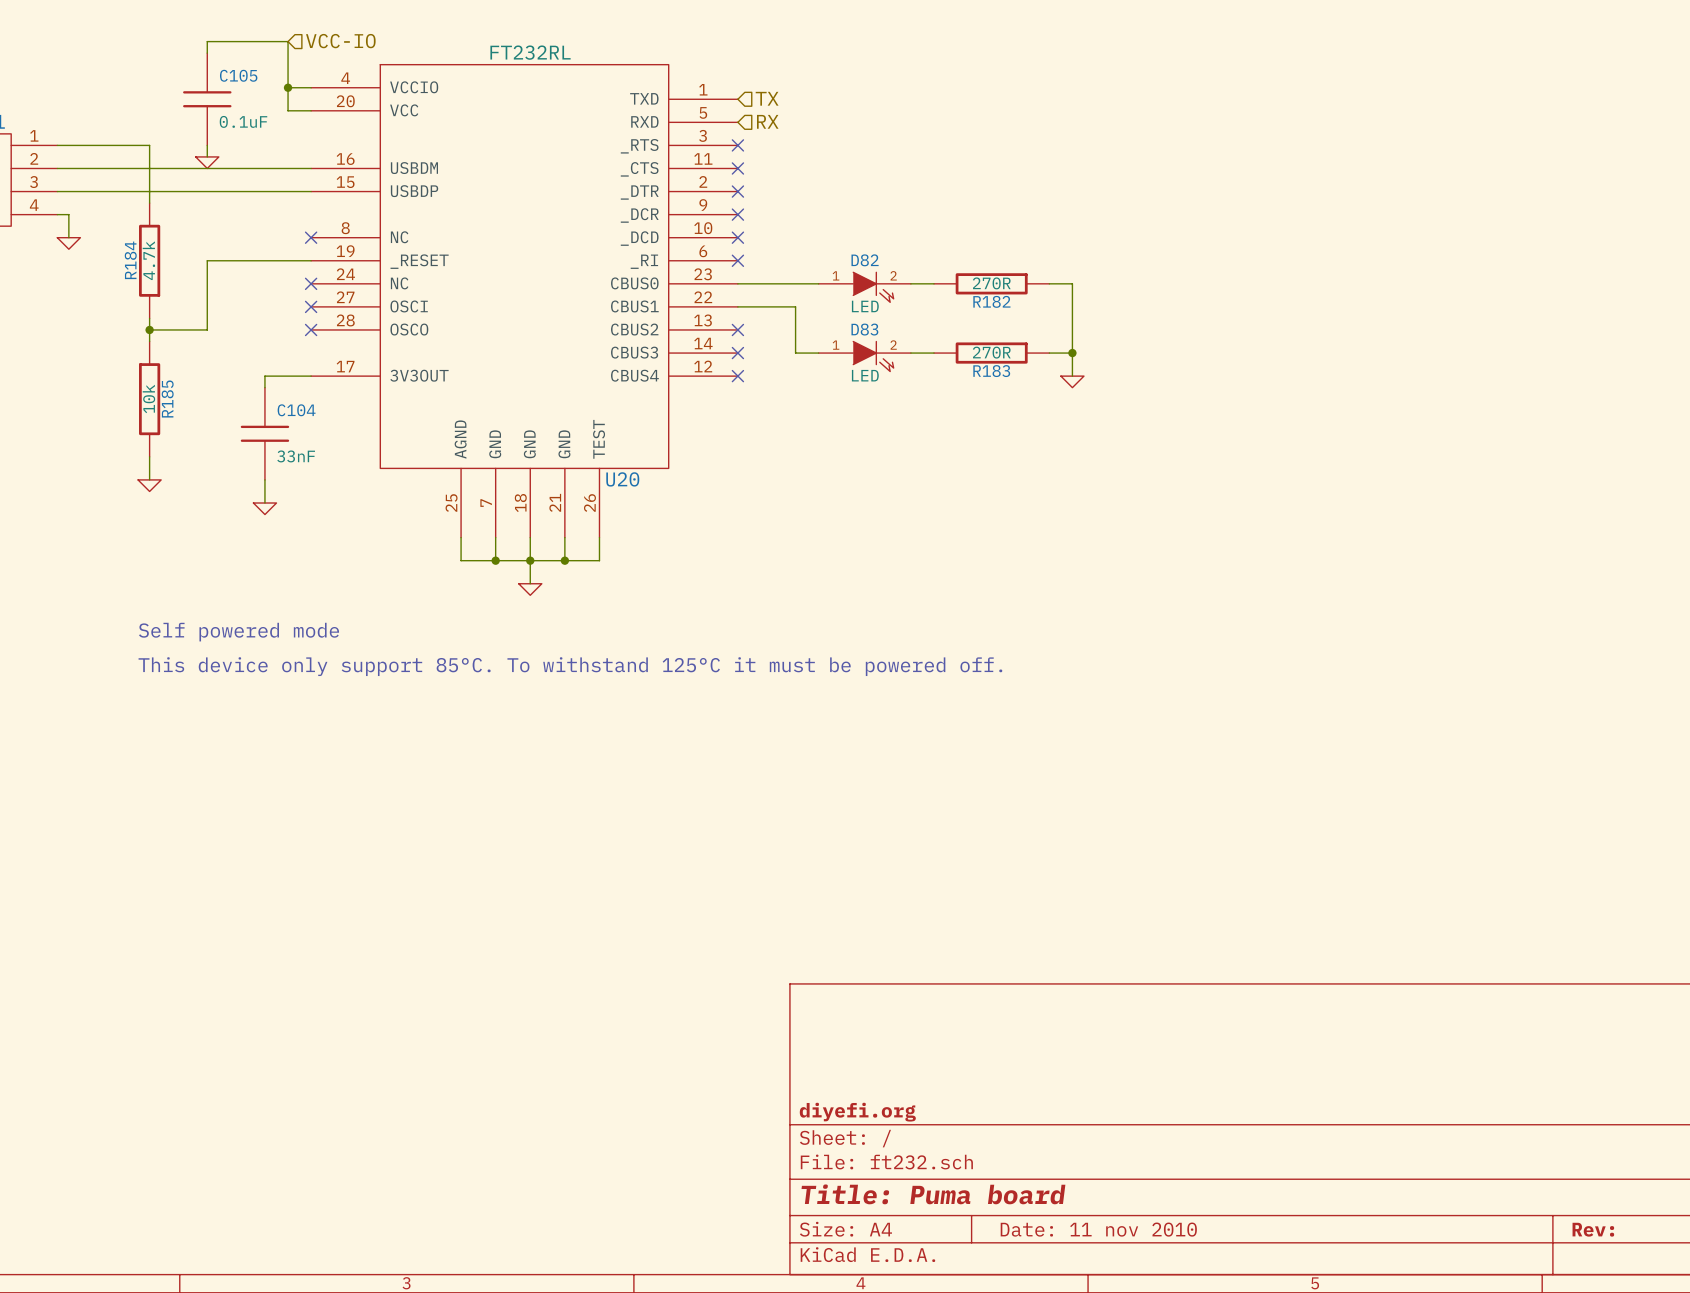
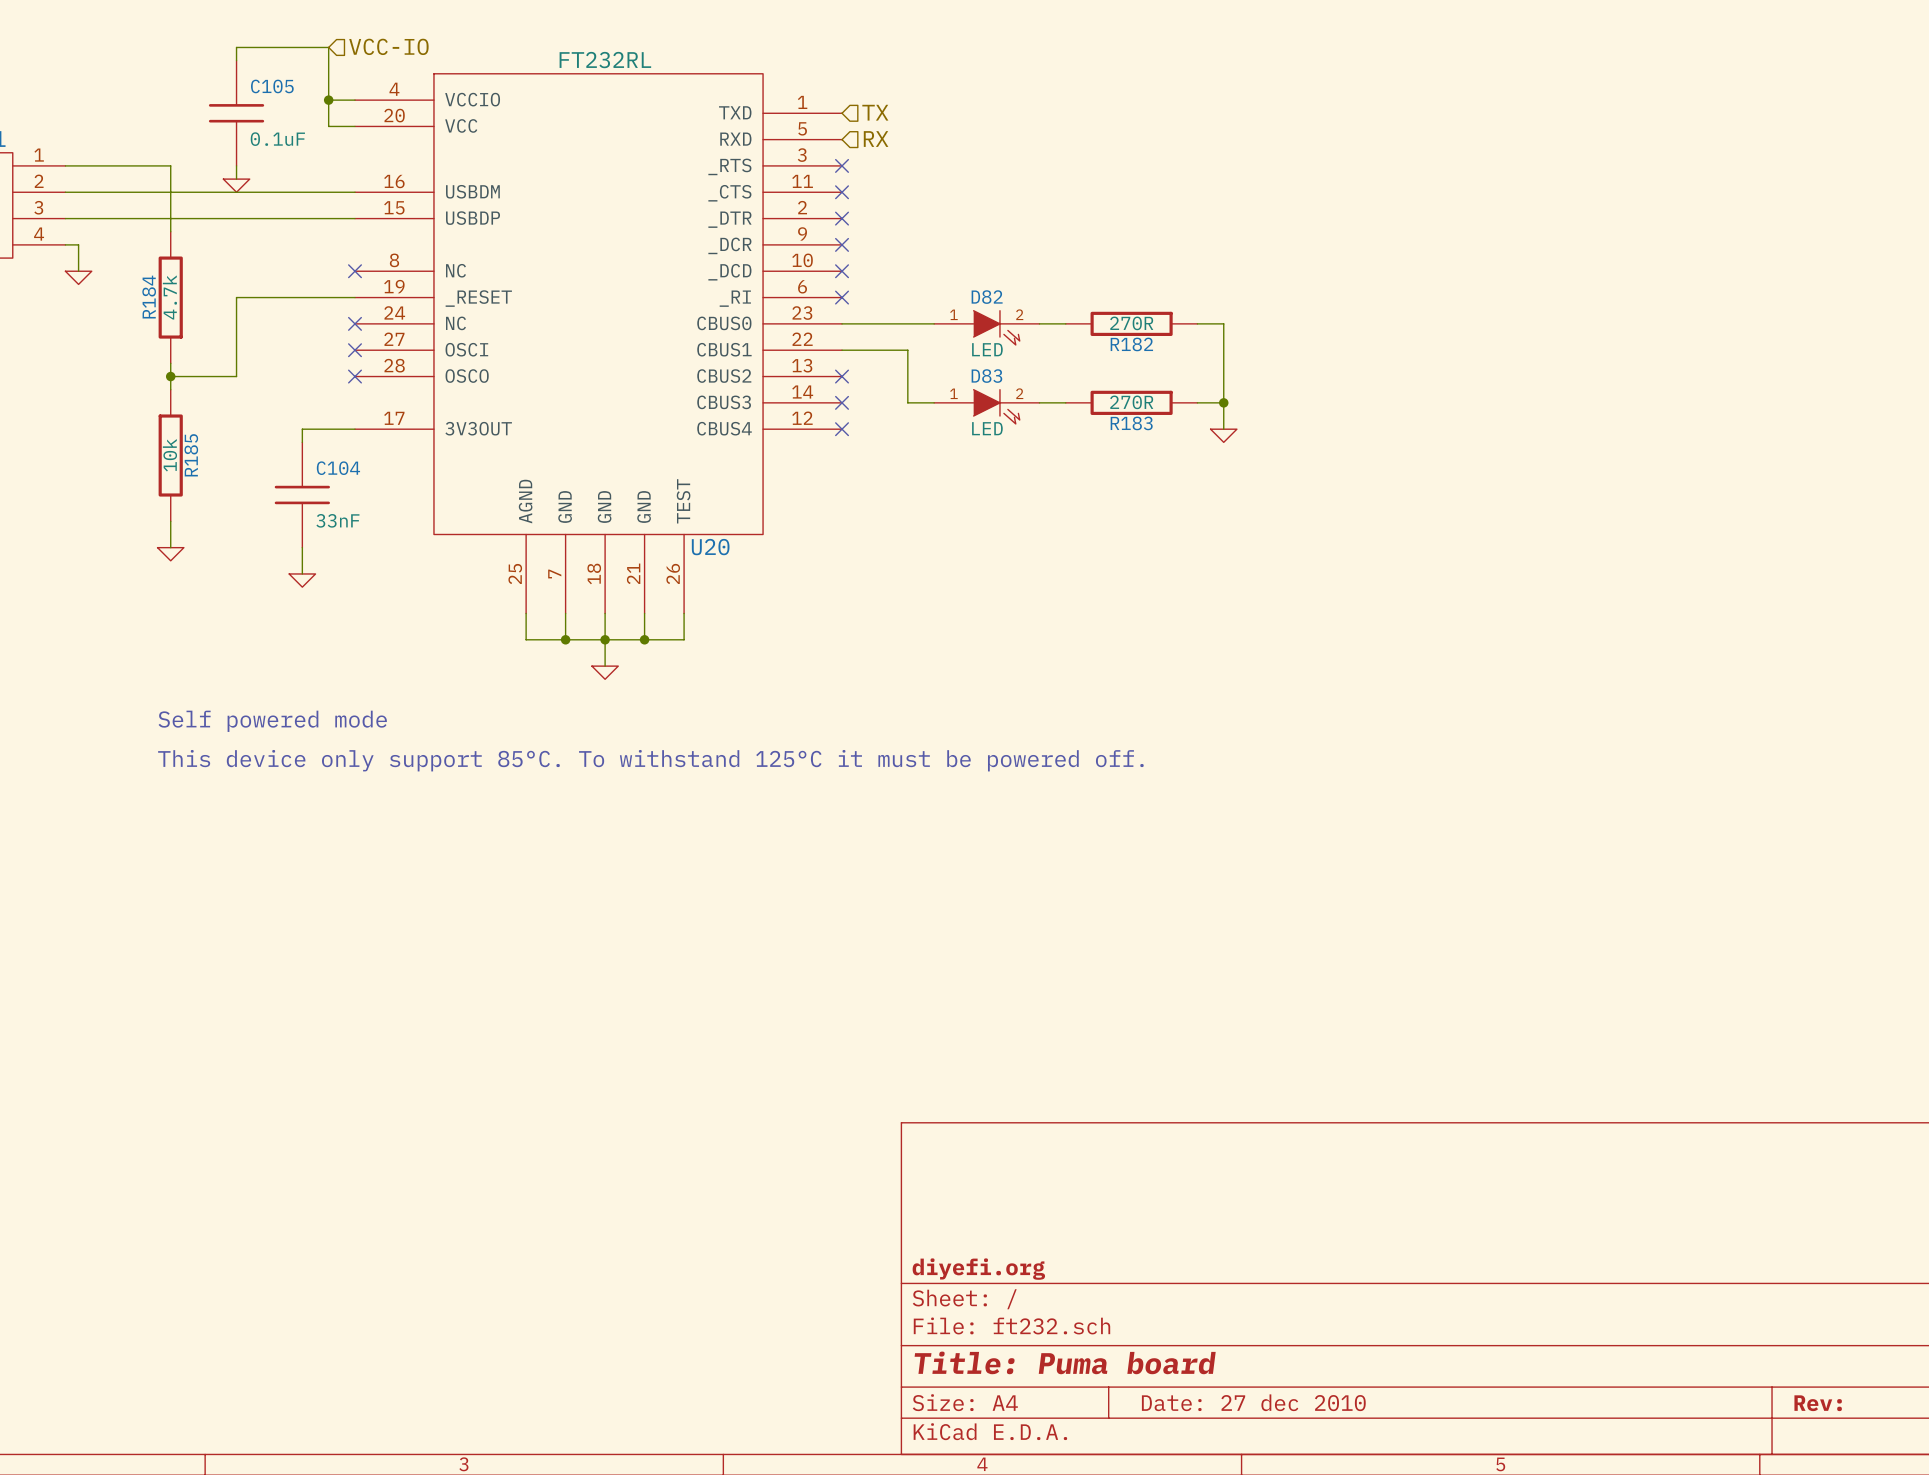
title block: Date: 11 nov 2010 (1098, 1229) -> Date: 27 dec 2010 (1253, 1402)

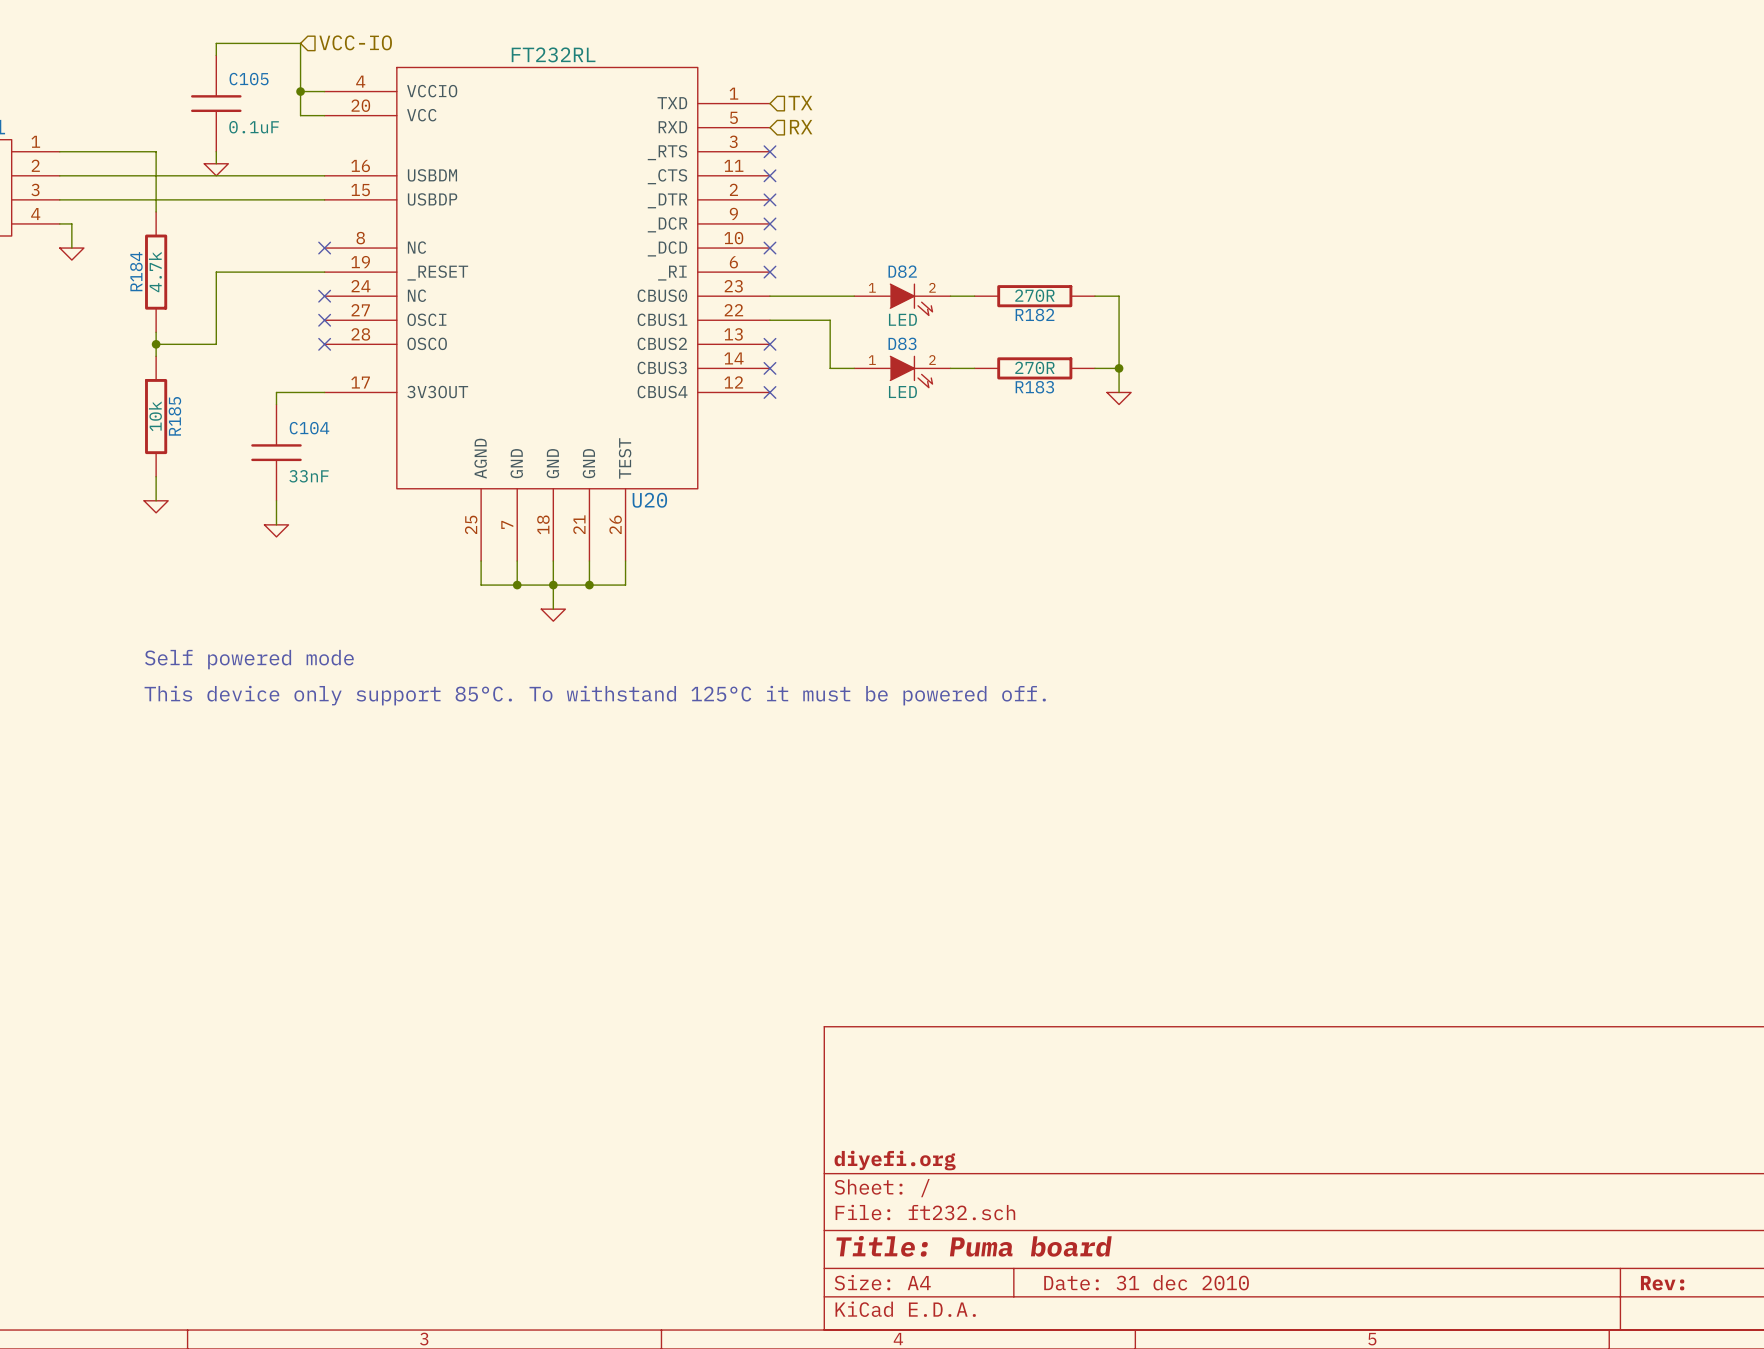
title block: Date: 27 dec 2010 (1253, 1402) -> Date: 31 dec 2010 (1146, 1282)

